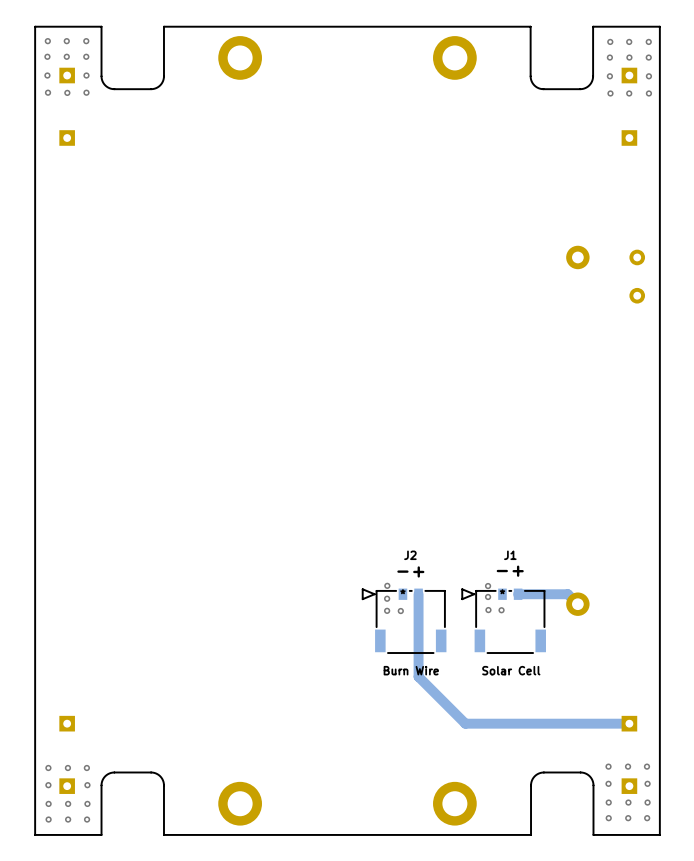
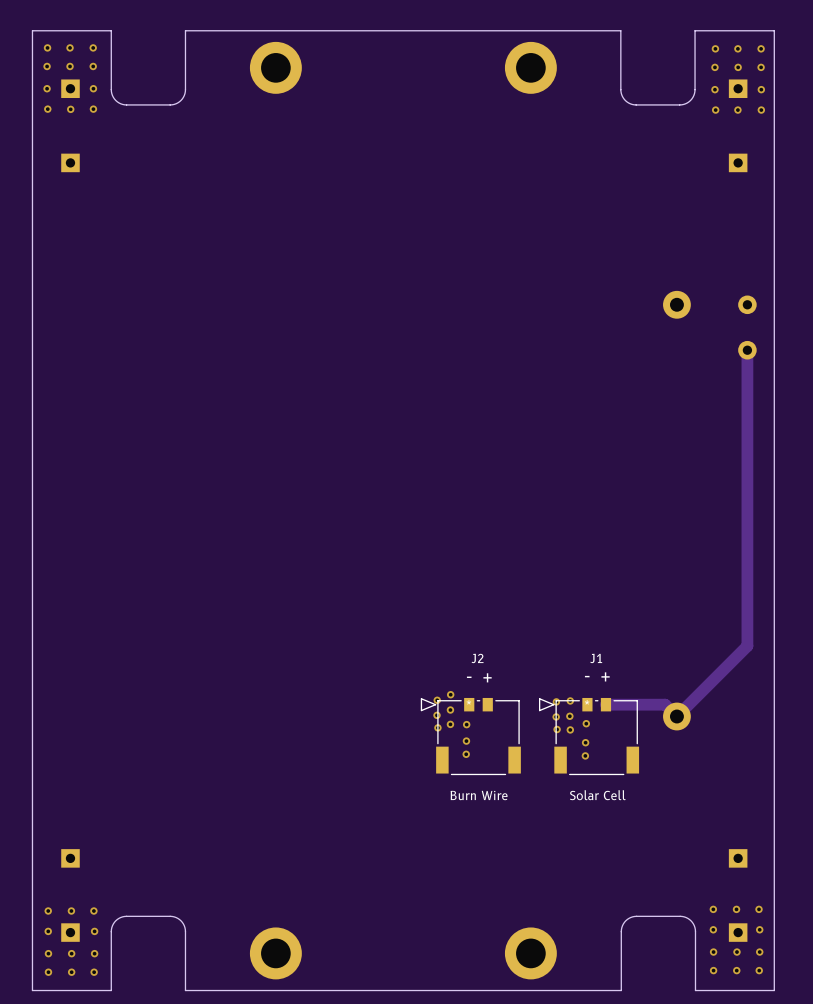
track: none -> (747, 350) (747, 646) (676, 716)
via: (488, 586) -> none
via: none -> (437, 700)
via: none -> (556, 701)
via: none -> (570, 700)
track: (418, 594) (418, 676) (465, 723) (629, 723) -> none
via: (488, 596) -> none
via: none -> (437, 715)
via: none -> (556, 716)
via: none -> (569, 716)
via: (488, 610) -> none
via: none -> (437, 727)
via: none -> (557, 729)
via: none -> (570, 729)
via: none -> (466, 741)
via: none -> (585, 742)
via: none -> (466, 754)
via: none -> (585, 755)

